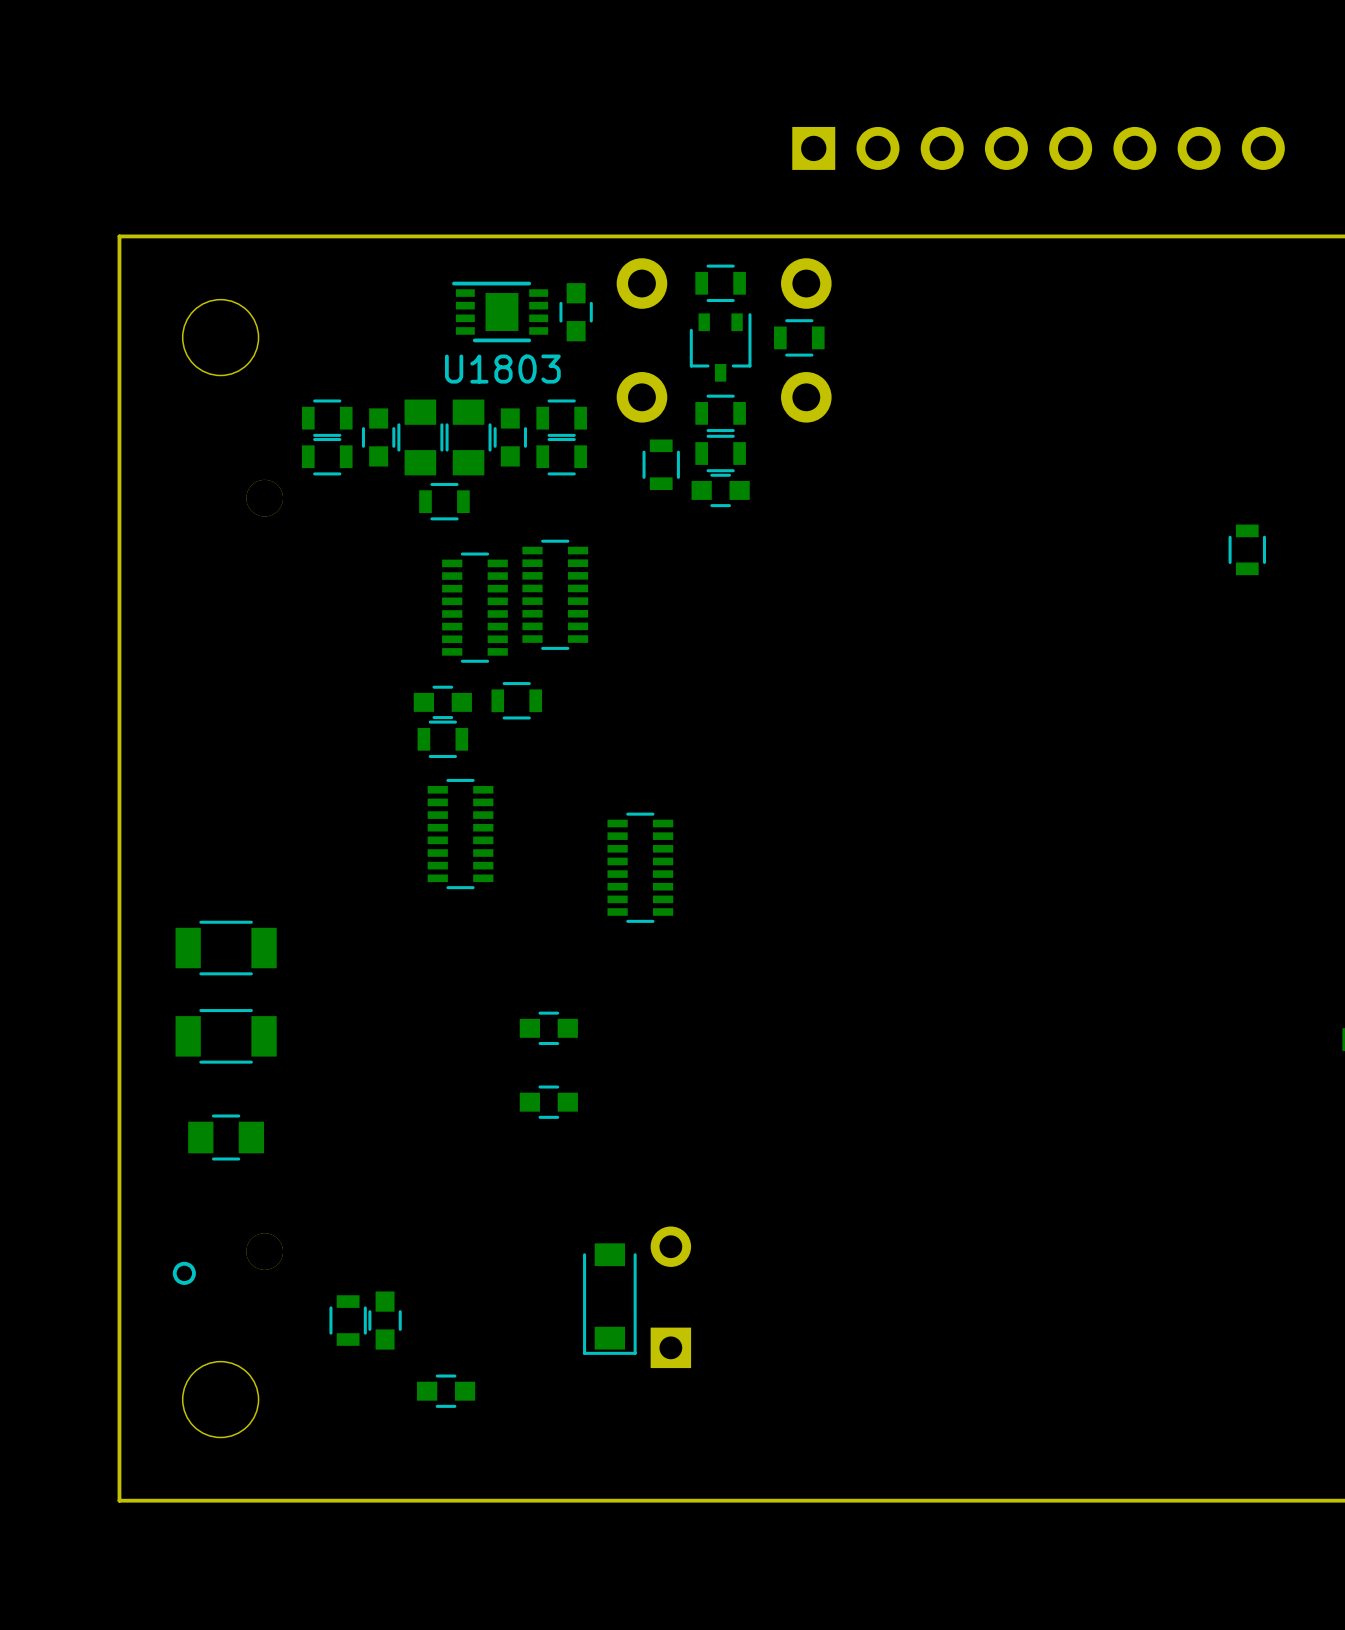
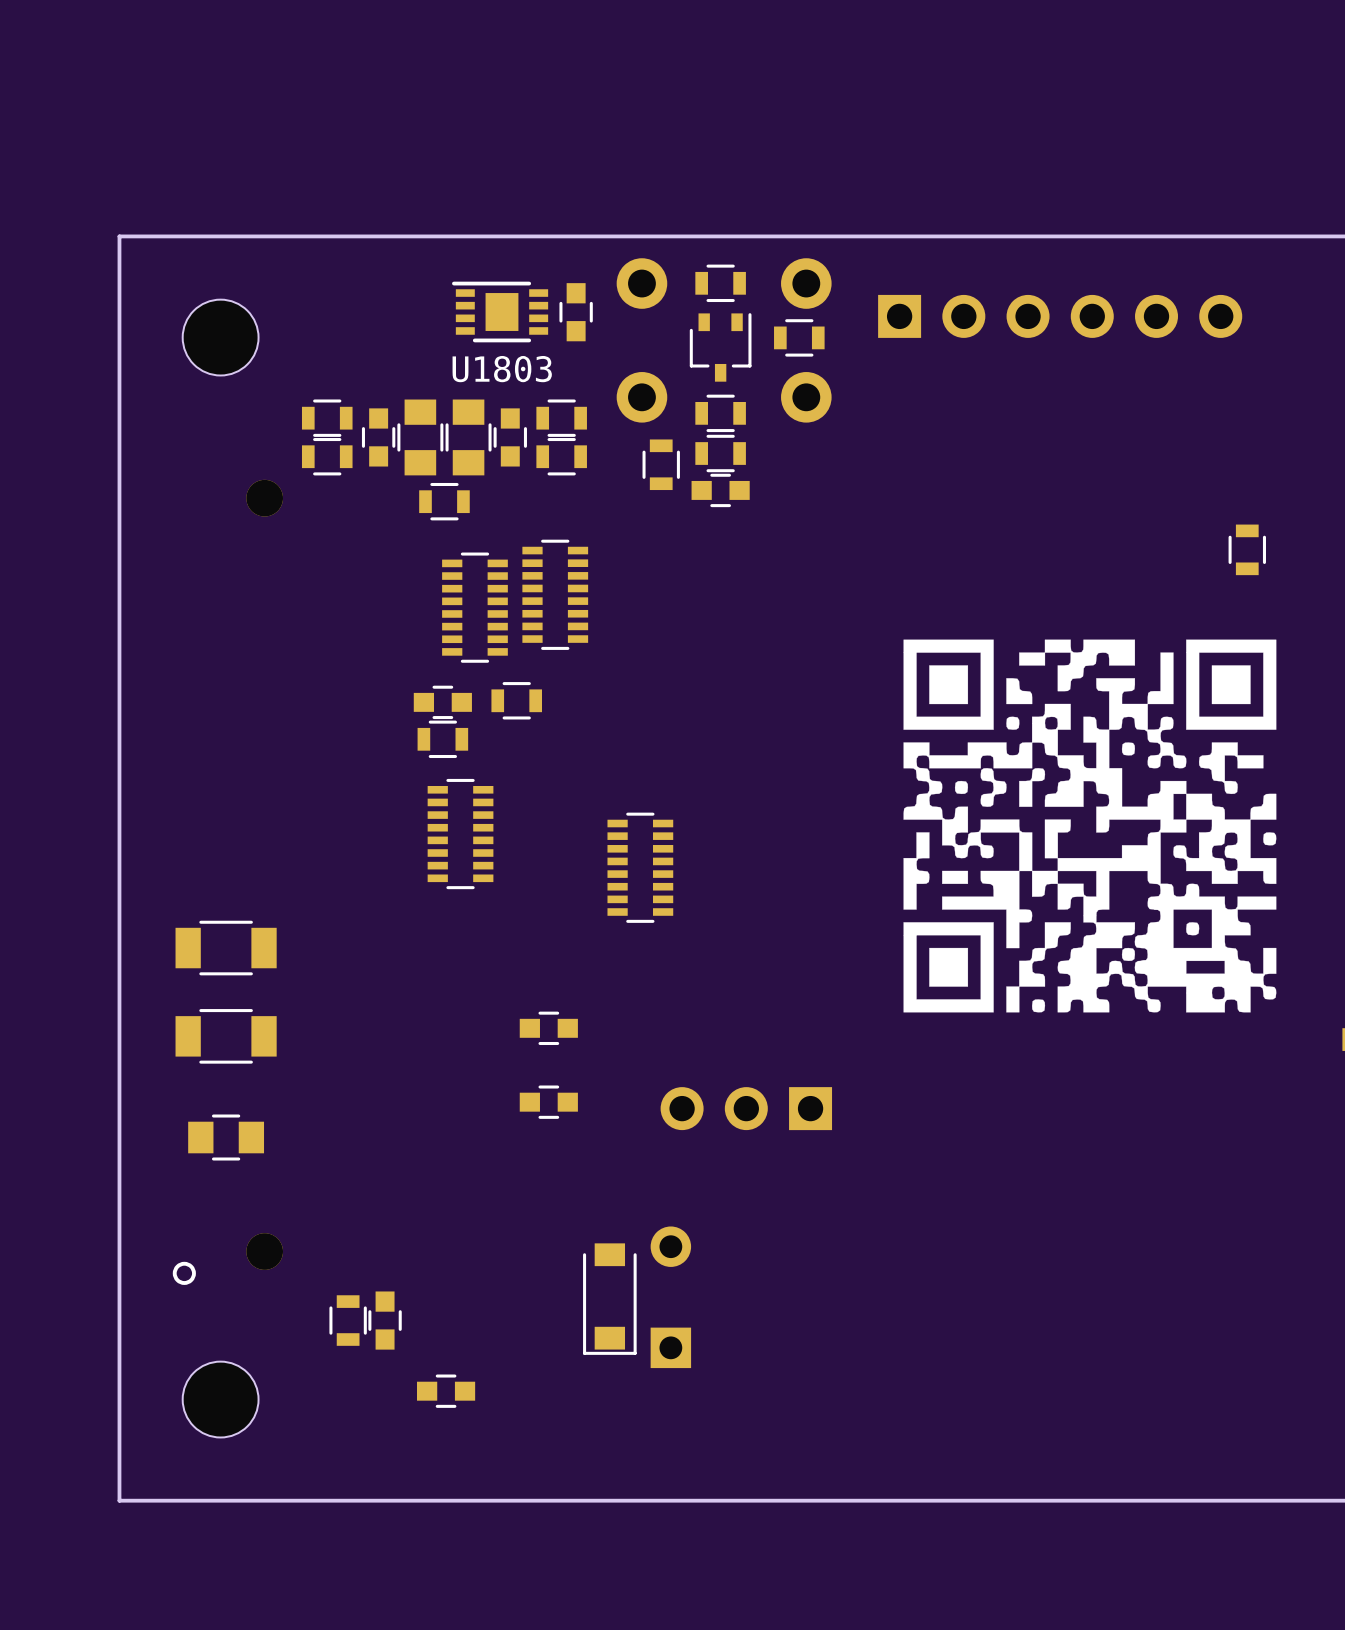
part: (1038, 148) -> none
part: none -> (1060, 316)
drawing: none -> [903, 639, 1277, 1013]
part: none -> (746, 1108)

